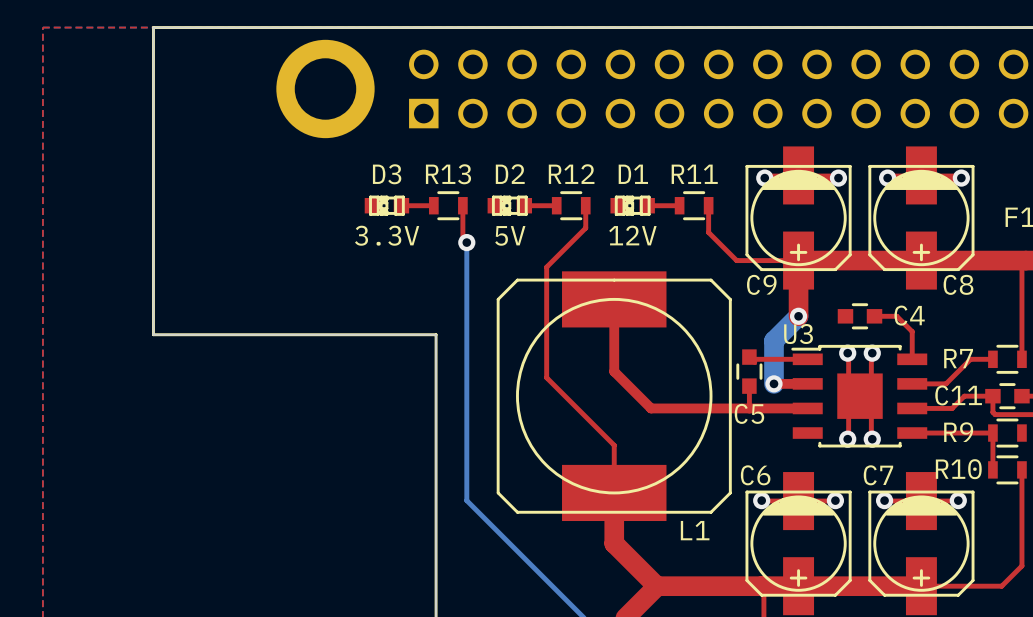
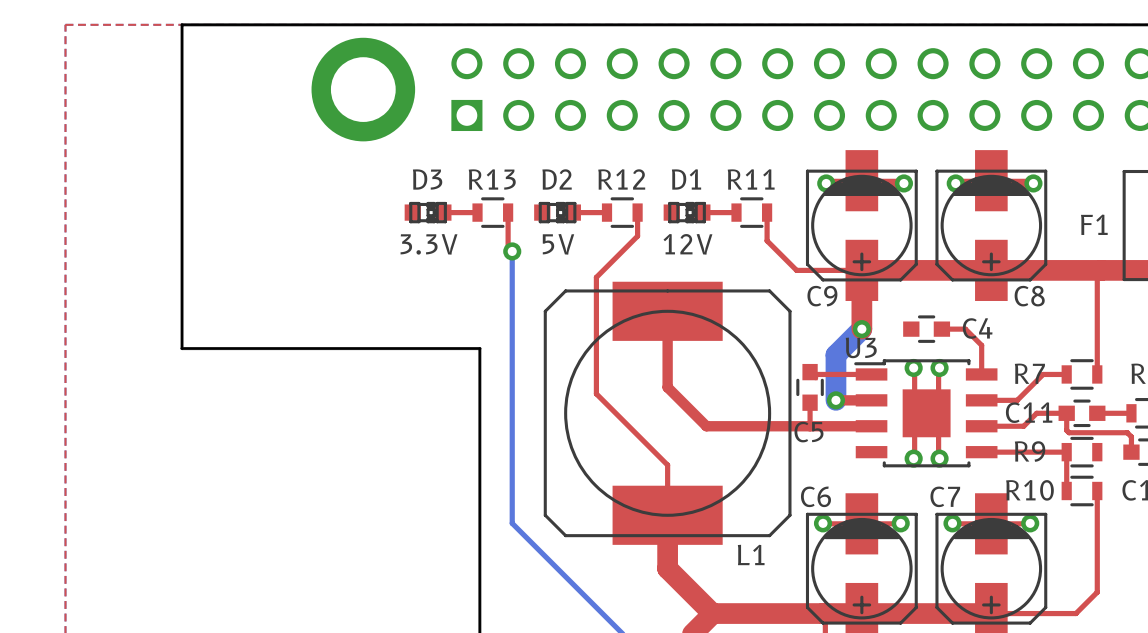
D3 rotation: 0° (386, 205) -> 180° (428, 212)
D2 rotation: 0° (509, 205) -> 180° (557, 212)
D1 rotation: 0° (632, 205) -> 180° (687, 212)

